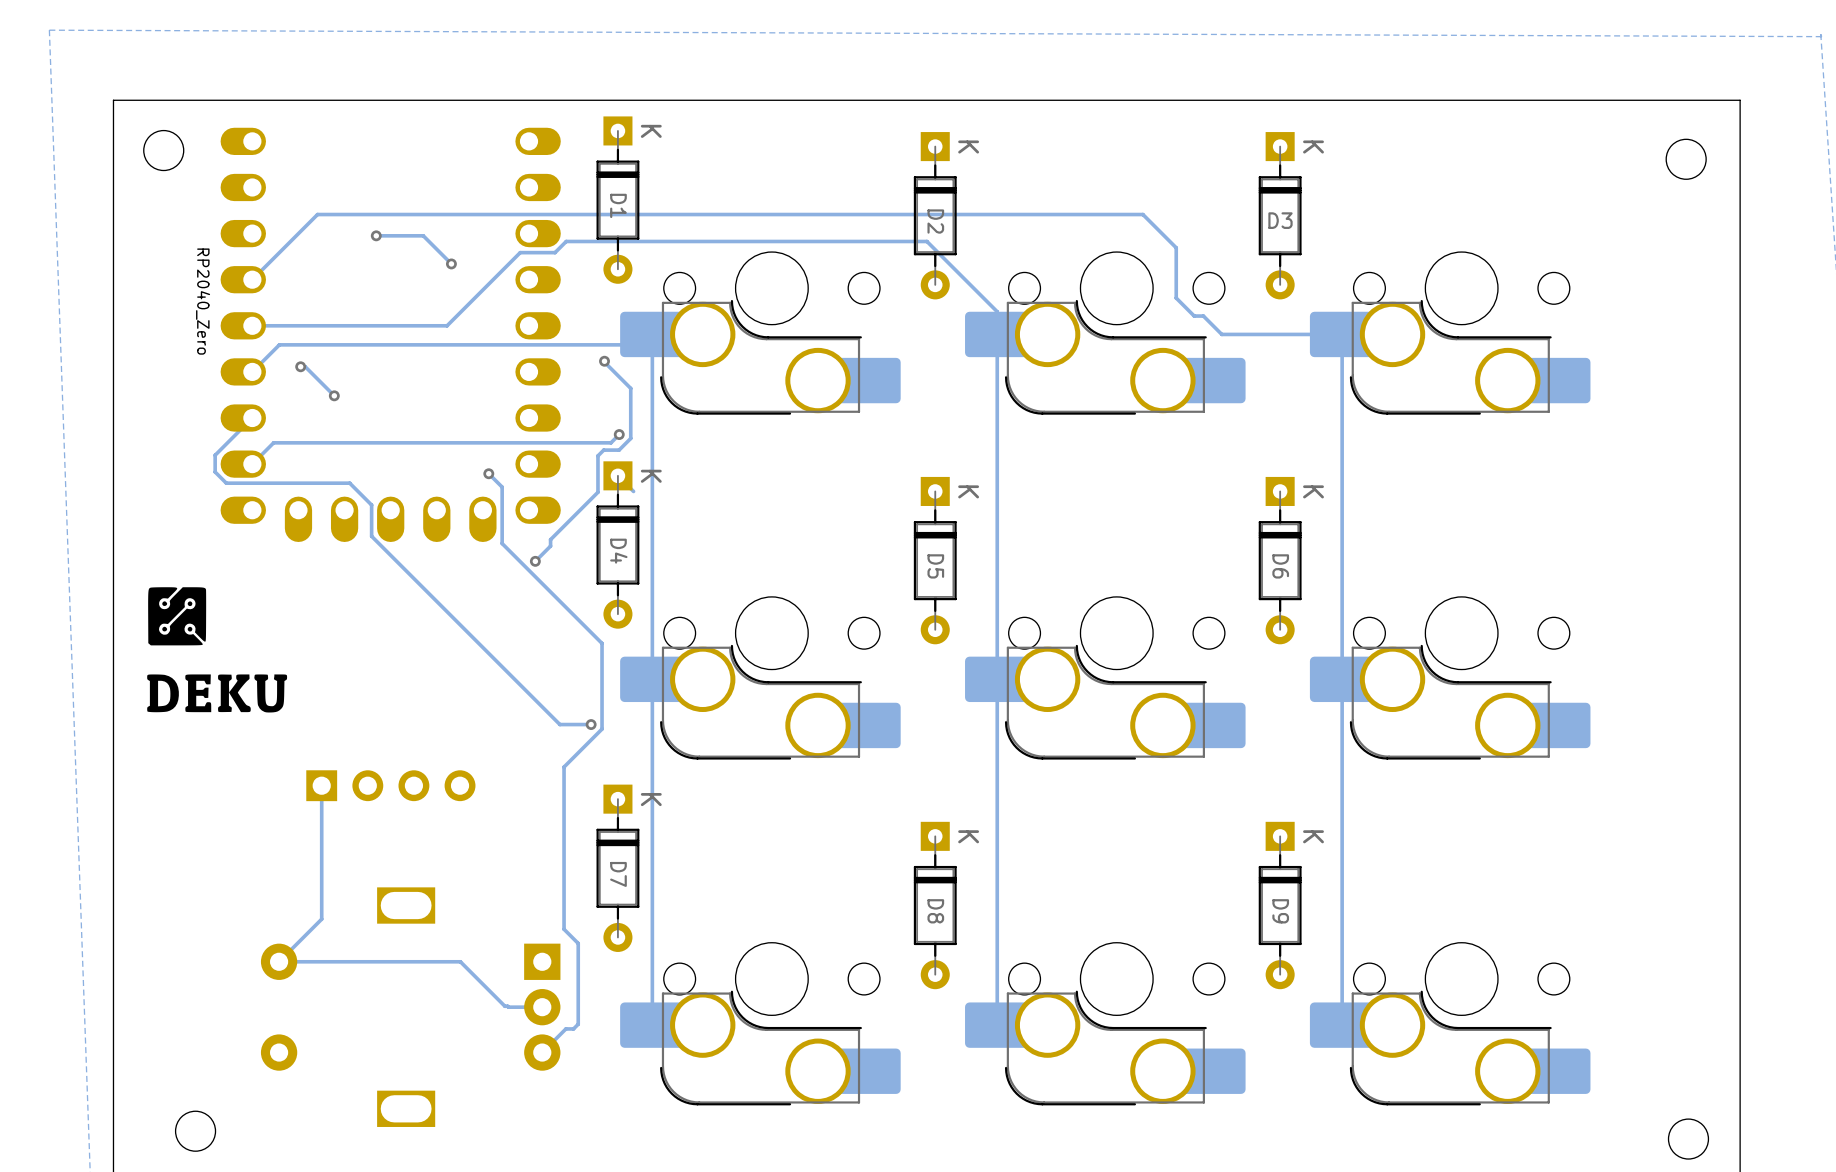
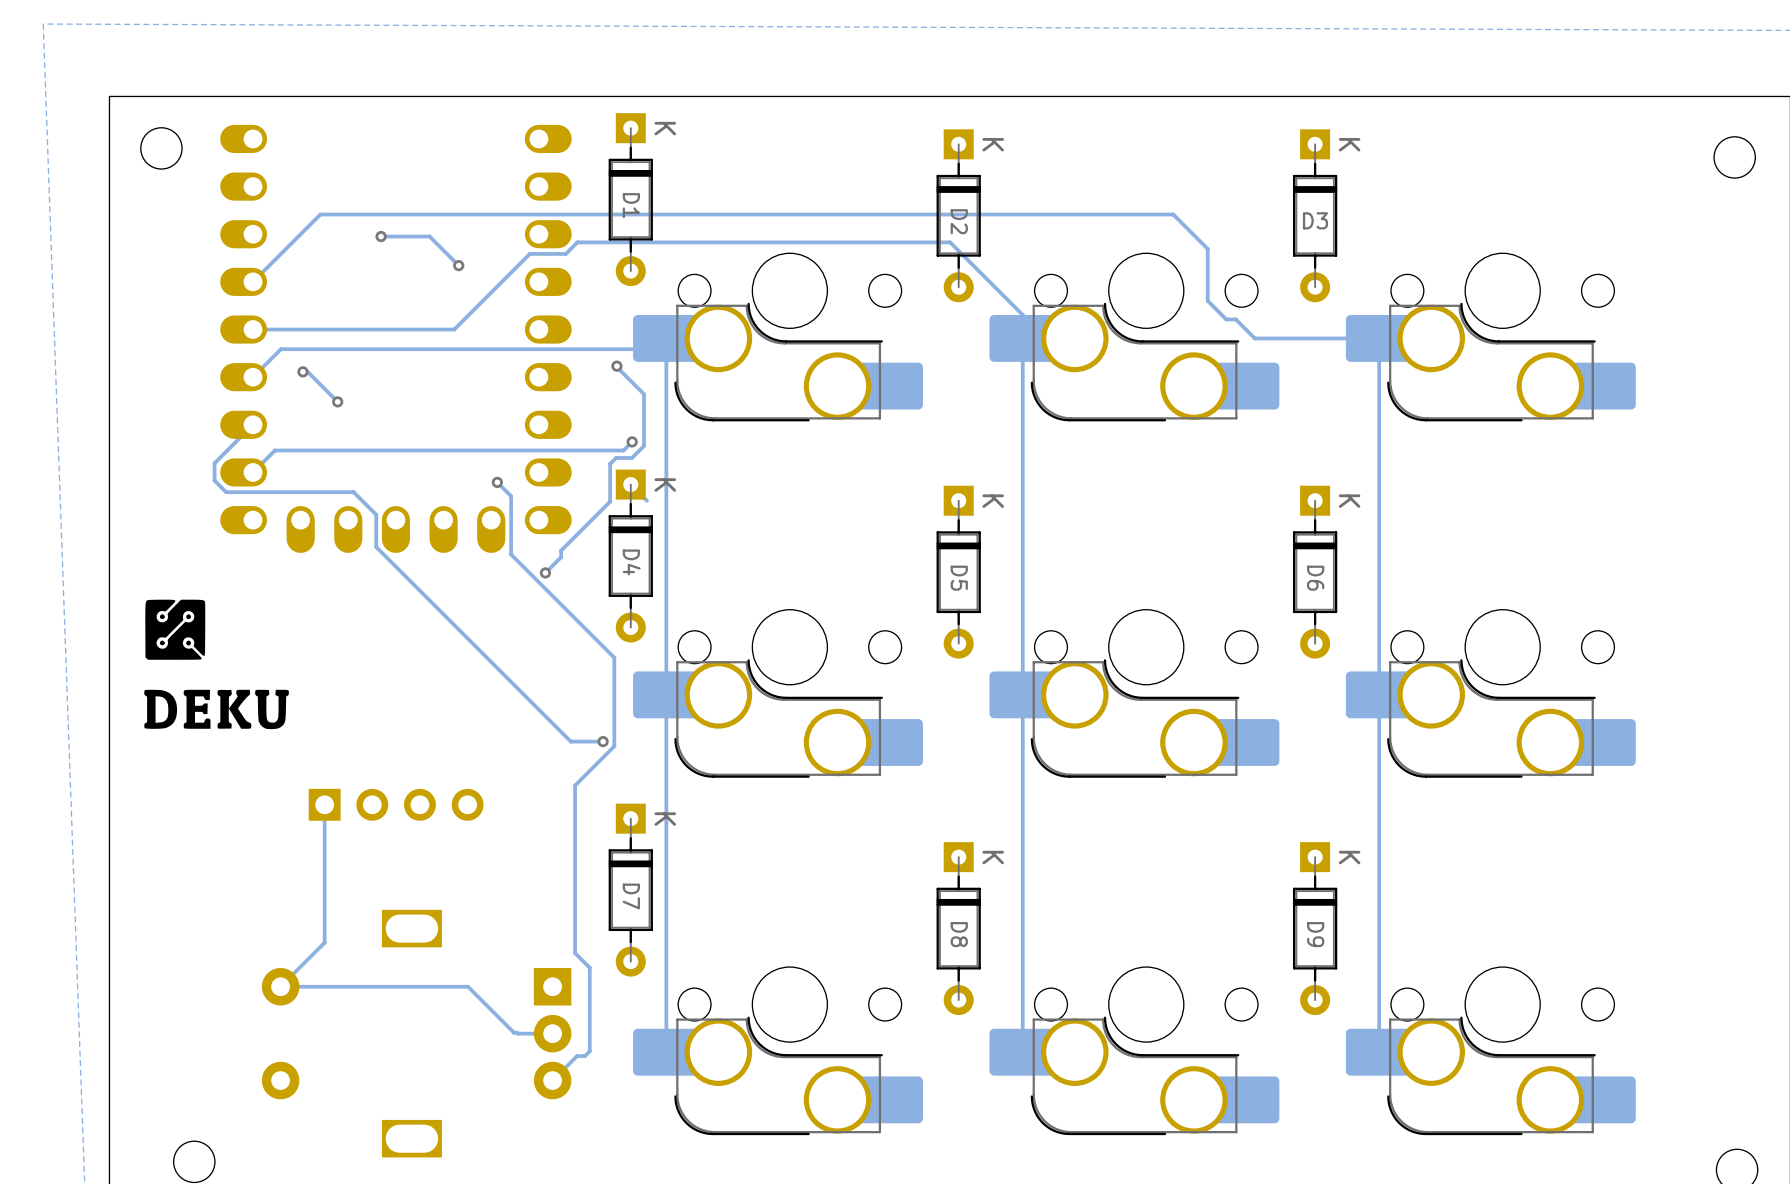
part value: RP2040_Zero (203, 301) -> none

